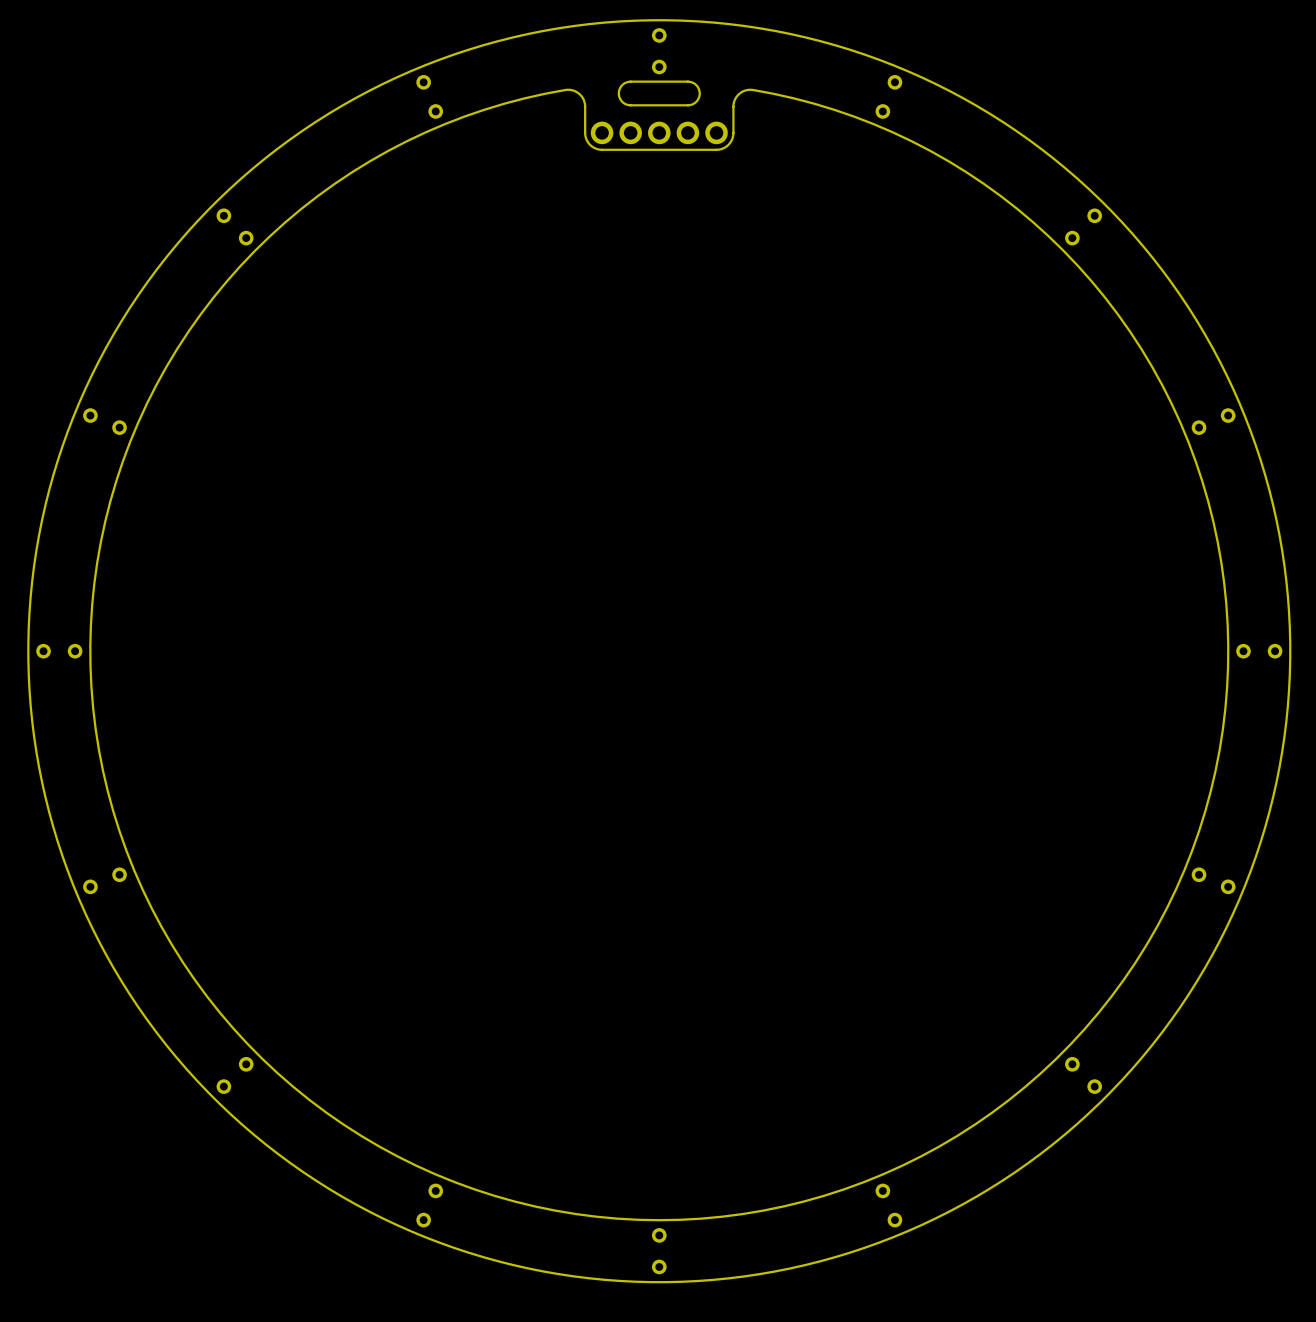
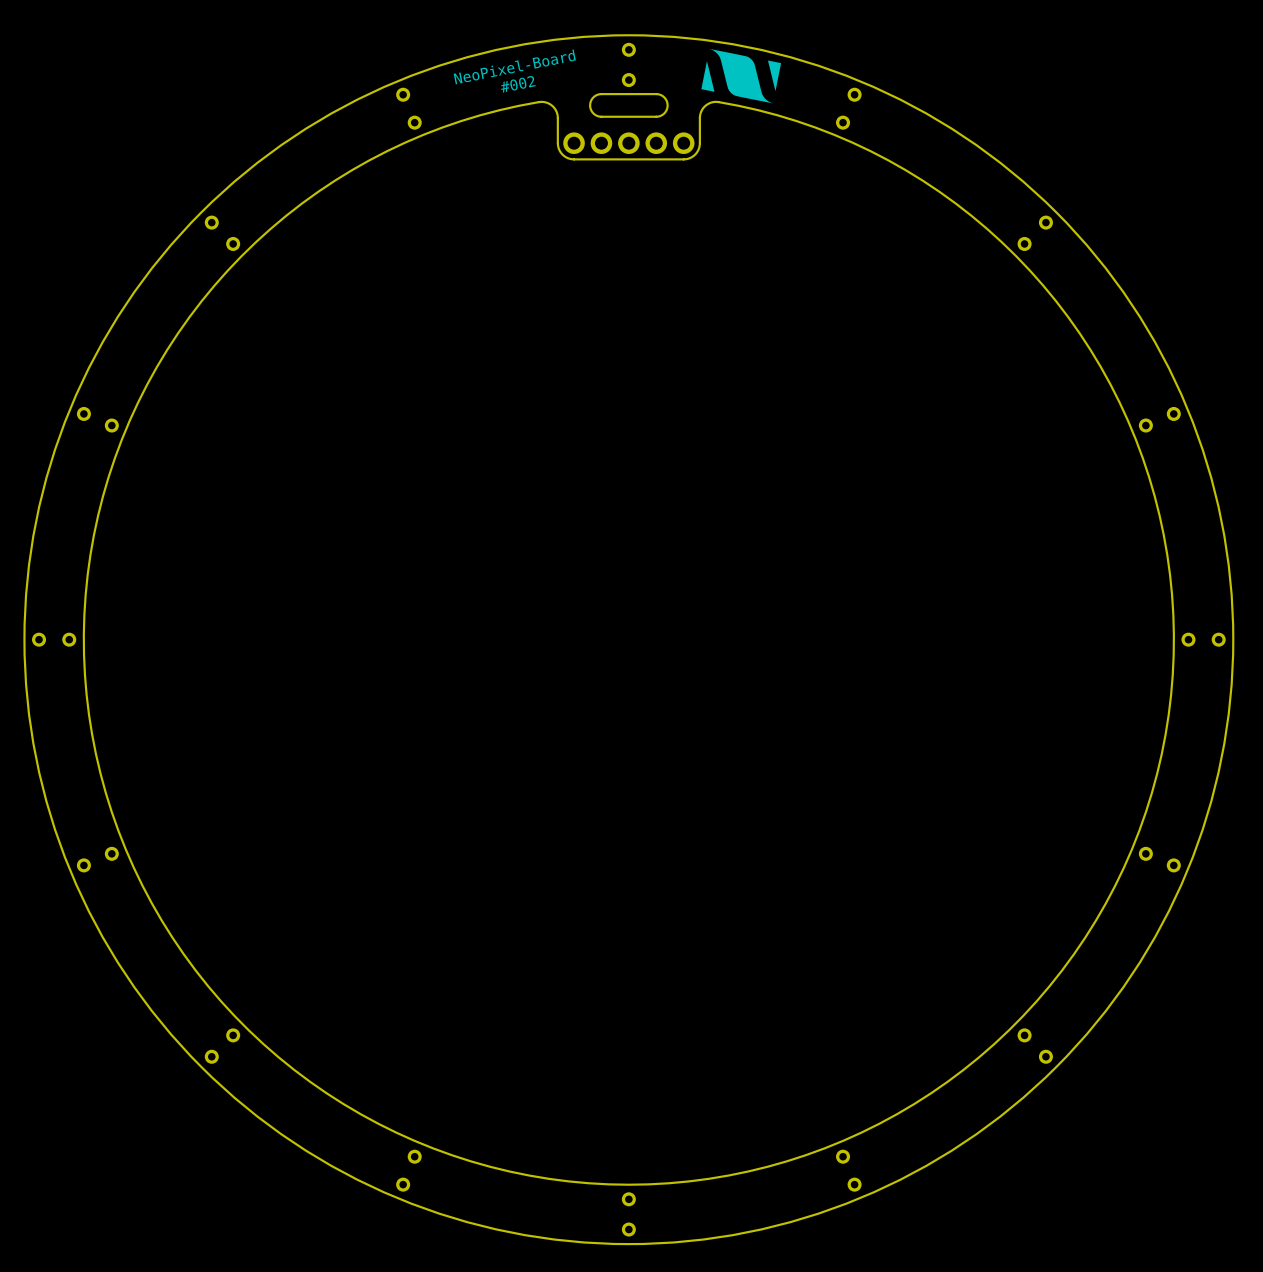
drawing: none -> [701, 48, 782, 104]
text: none -> NeoPixel-Board (514, 66)
text: none -> #002 (518, 84)

